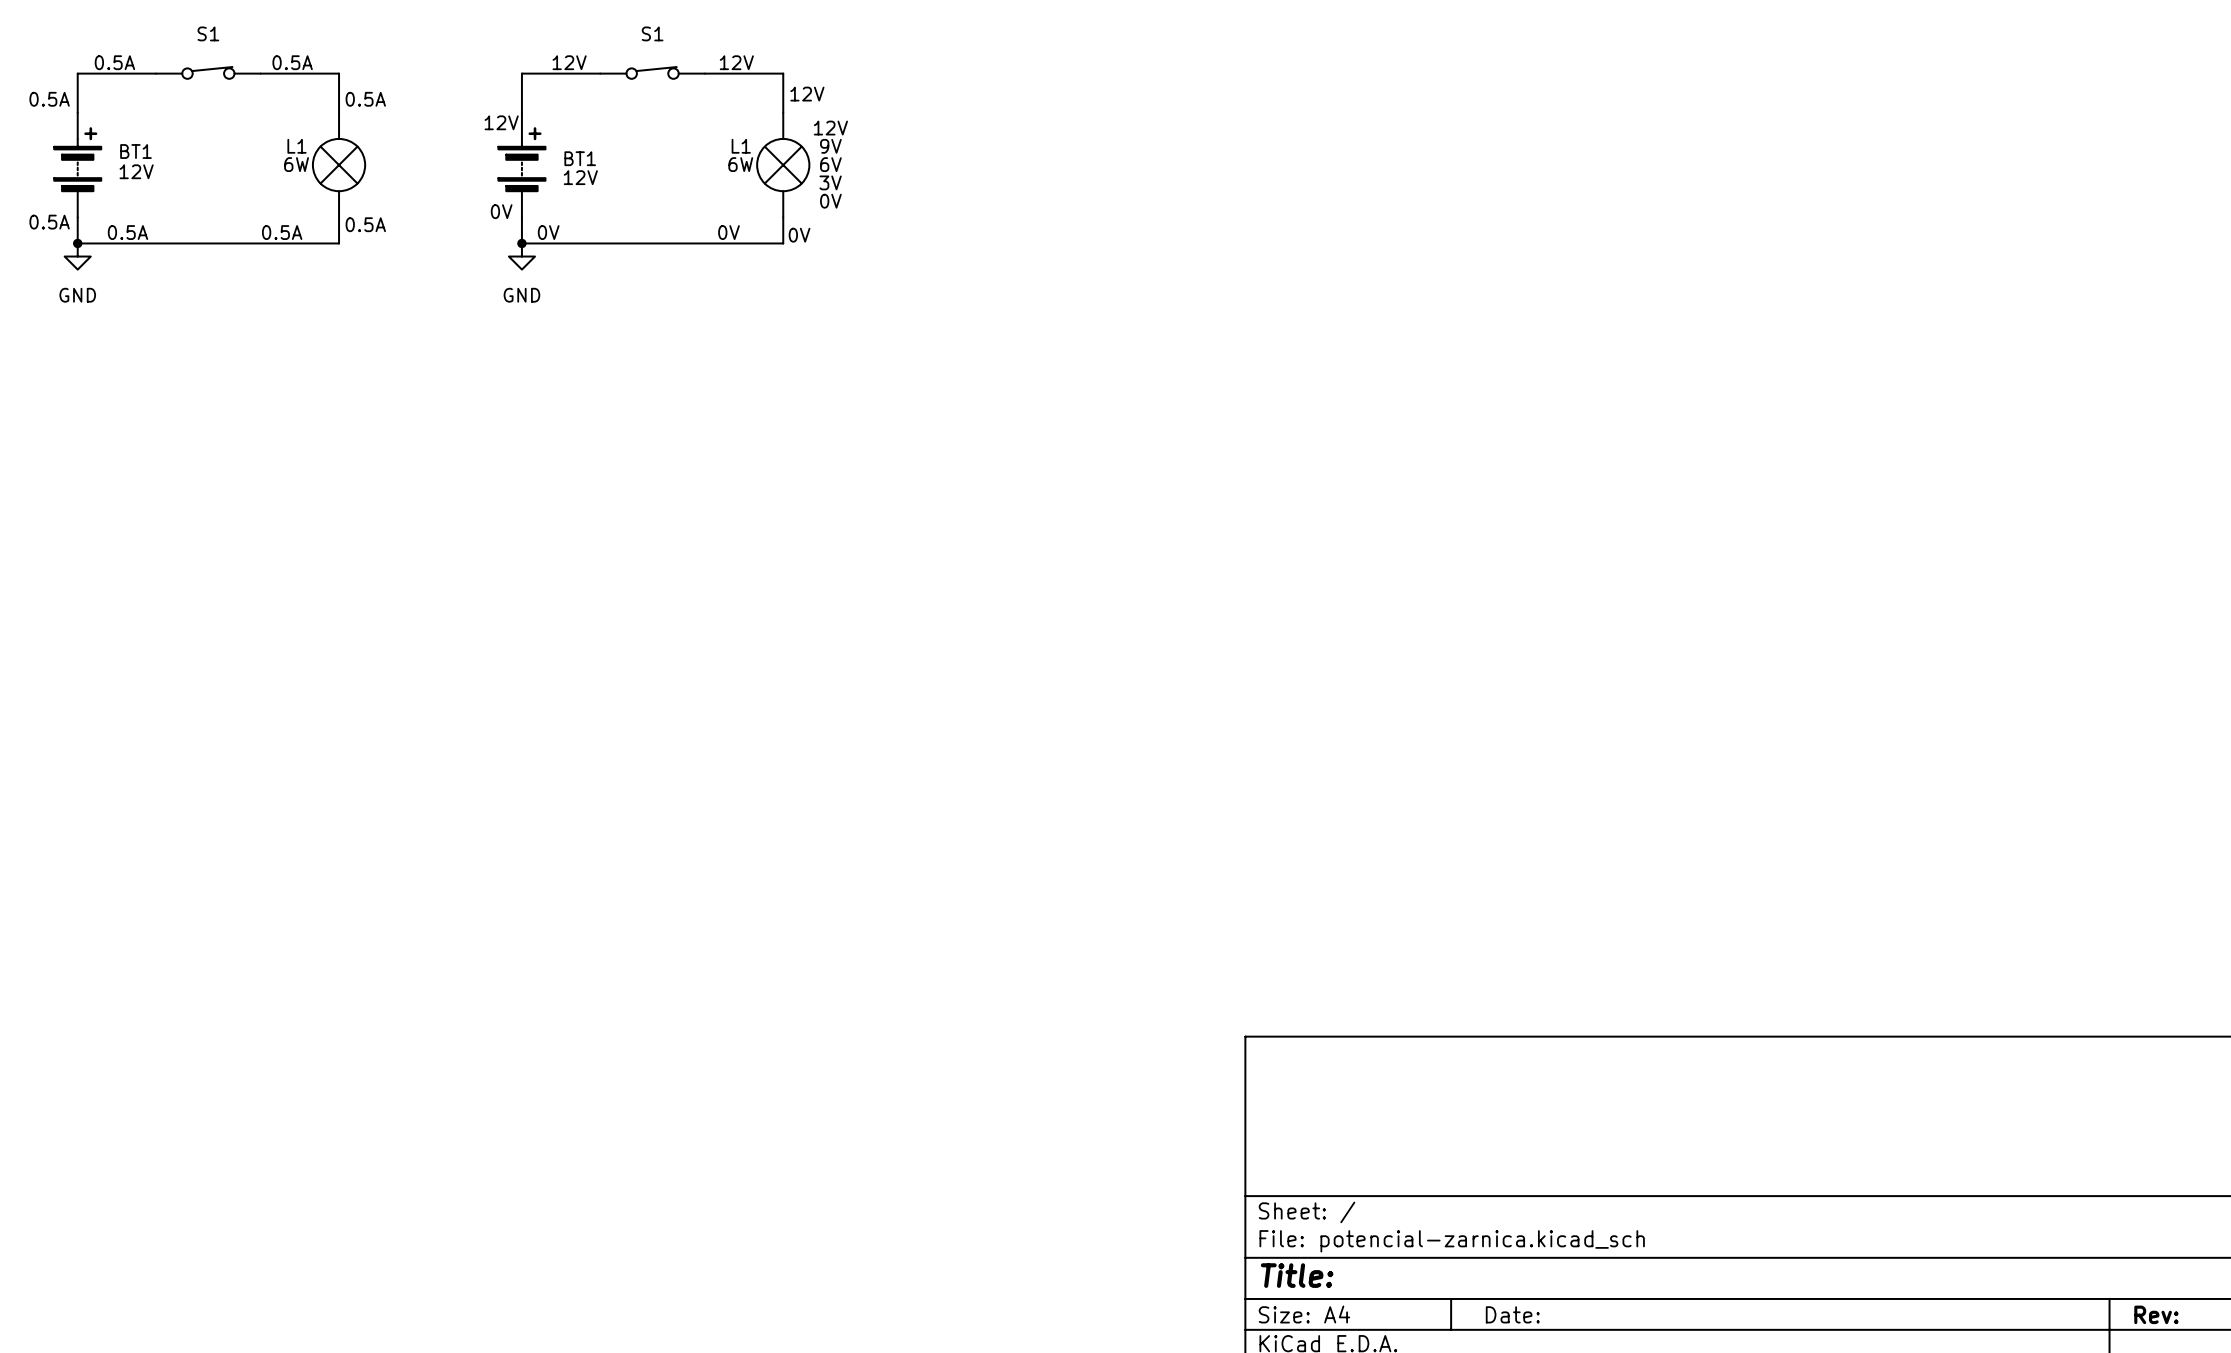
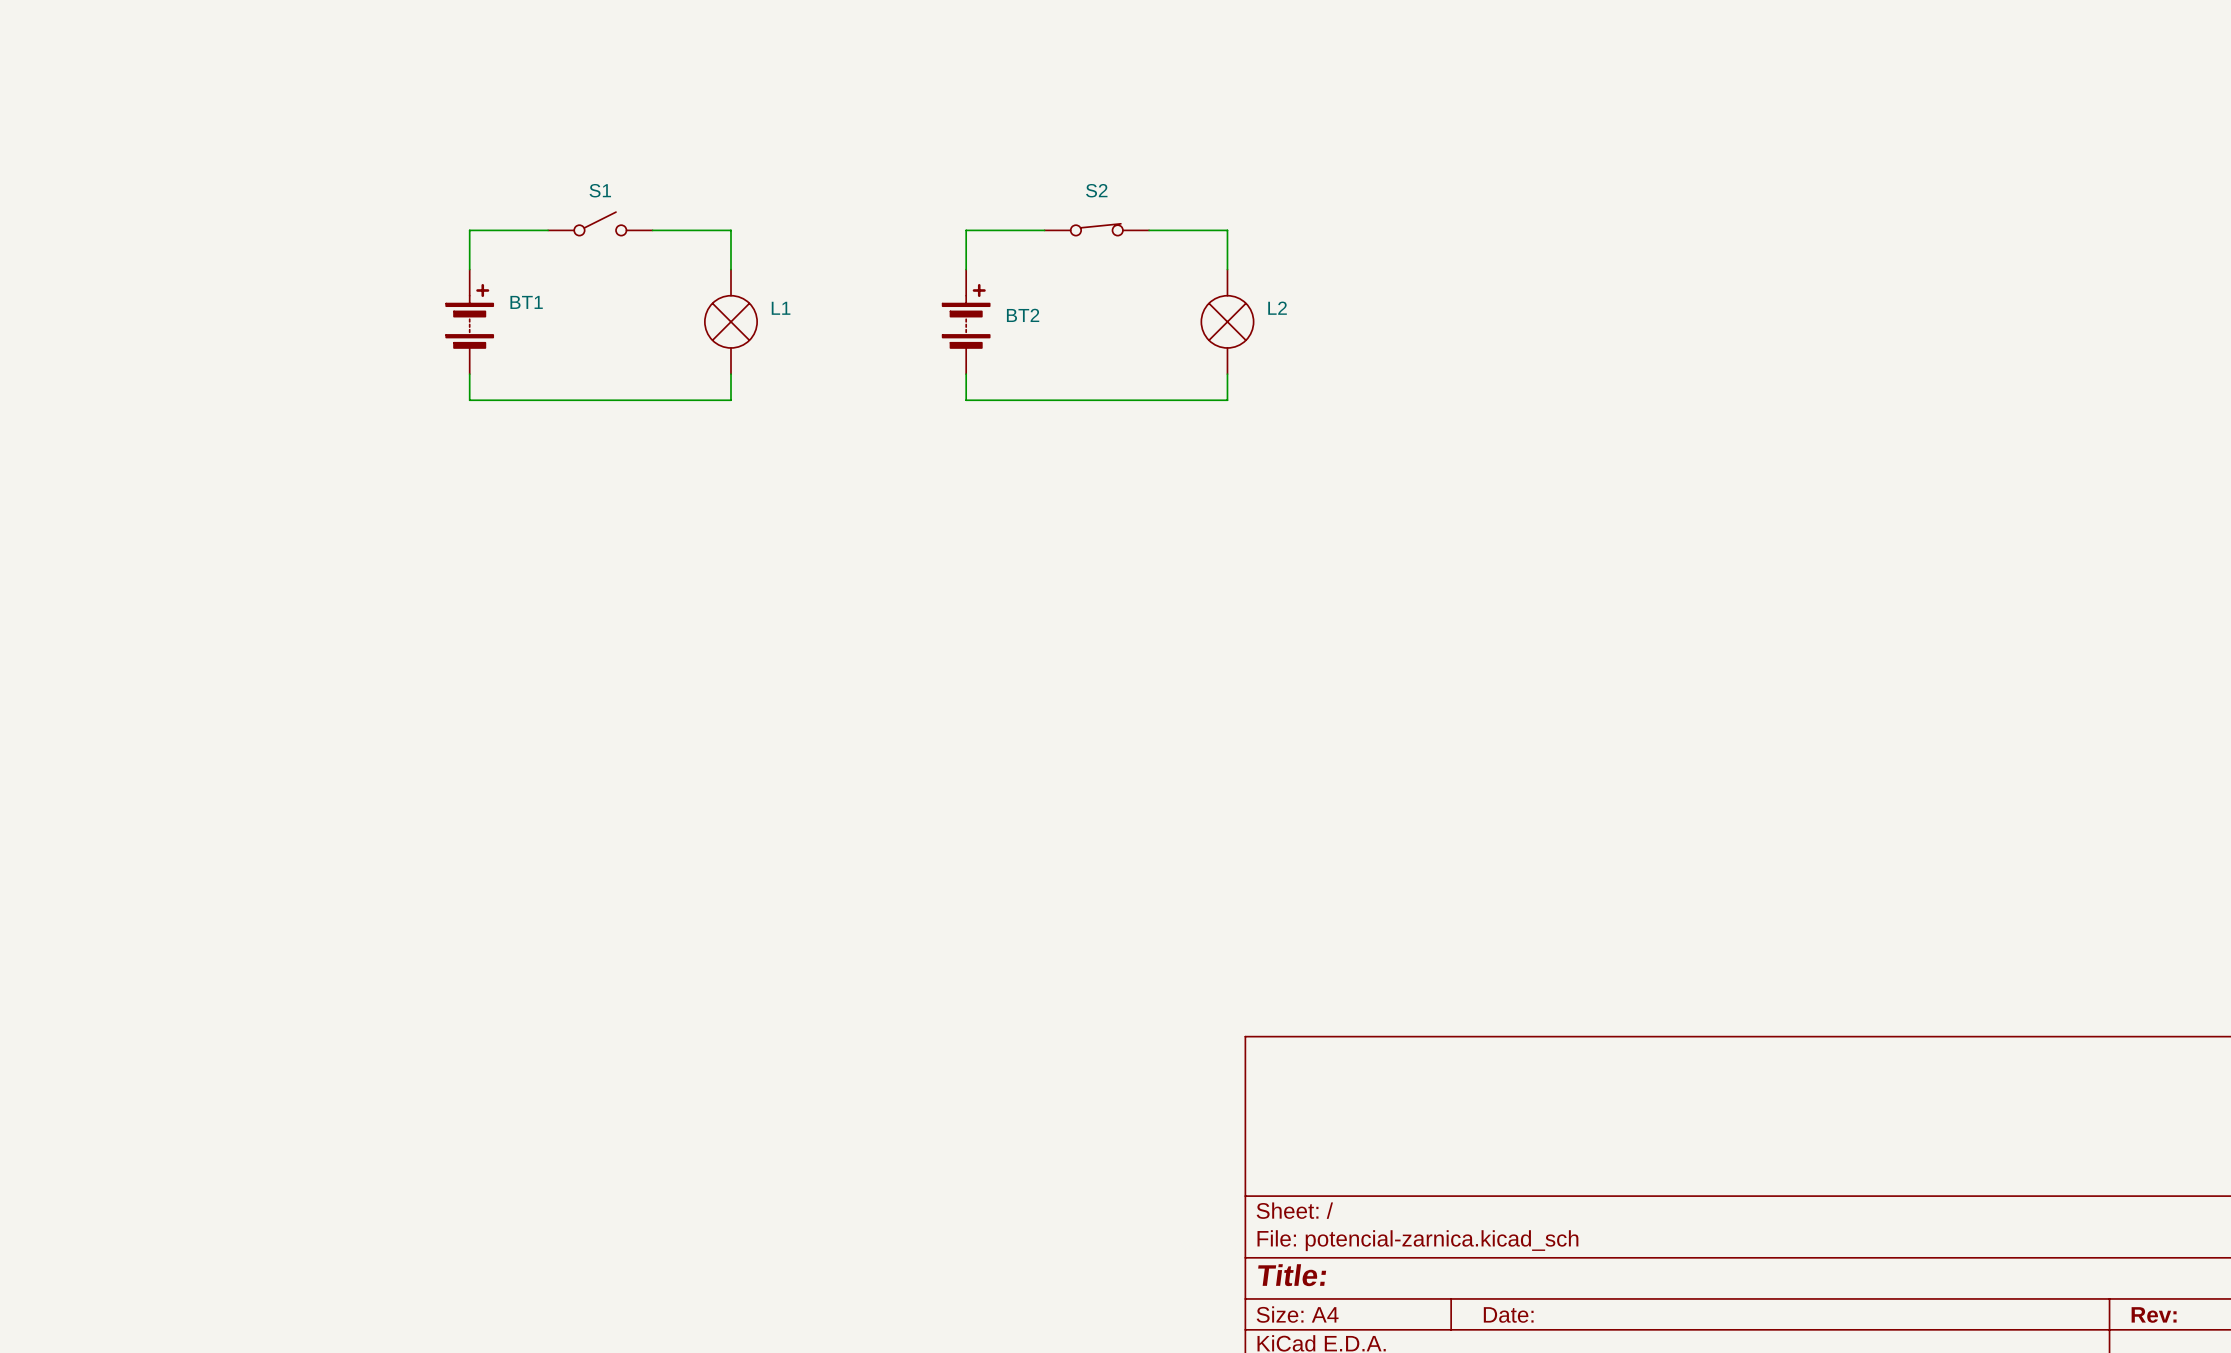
text: 0.5A (114, 62) -> none
text: 0.5A (292, 62) -> none
text: 12V (569, 62) -> none
text: 12V (736, 62) -> none
part: S1 (208, 72) -> none
part: S1 (652, 72) -> none
wire: (156, 73) (77, 73) (77, 112) -> none
wire: (260, 73) (339, 73) (339, 112) -> none
wire: (600, 73) (521, 73) (521, 112) -> (548, 230) (469, 230) (469, 269)
wire: (704, 73) (783, 73) (783, 112) -> (652, 230) (730, 230) (730, 269)
text: 12V (807, 94) -> none
text: 0.5A (49, 99) -> none
text: 0.5A (365, 99) -> none
text: 12V (501, 122) -> none
text: 12V (830, 128) -> none
text: 9V (830, 146) -> none
text: 6V (830, 164) -> none
BT1: 12V (77, 165) -> none
L1: 6W (339, 165) -> none
BT1: 12V (521, 165) -> none
L1: 6W (783, 165) -> none
text: 3V (830, 182) -> none
text: 0V (830, 201) -> none
text: 0V (501, 211) -> none
wire: (77, 217) (77, 243) (339, 243) (339, 217) -> none
wire: (521, 217) (521, 243) (783, 243) (783, 217) -> (469, 374) (469, 400) (730, 400) (730, 374)
text: 0.5A (49, 222) -> none
part: none -> S1 (600, 223)
text: 0.5A (365, 224) -> none
part: none -> S2 (1096, 229)
wire: none -> (1044, 230) (966, 230) (966, 269)
wire: none -> (1149, 230) (1227, 230) (1227, 269)
text: 0.5A (128, 232) -> none
text: 0.5A (282, 232) -> none
text: 0V (548, 232) -> none
text: 0V (729, 232) -> none
text: 0V (799, 235) -> none
junction: (77, 243) -> none
junction: (521, 243) -> none
power symbol: GND (77, 256) -> none
power symbol: GND (521, 256) -> none
BT1: none -> (469, 321)
L1: none -> (730, 321)
BT2: none -> (966, 321)
L2: none -> (1227, 321)
wire: none -> (966, 374) (966, 400) (1227, 400) (1227, 374)

